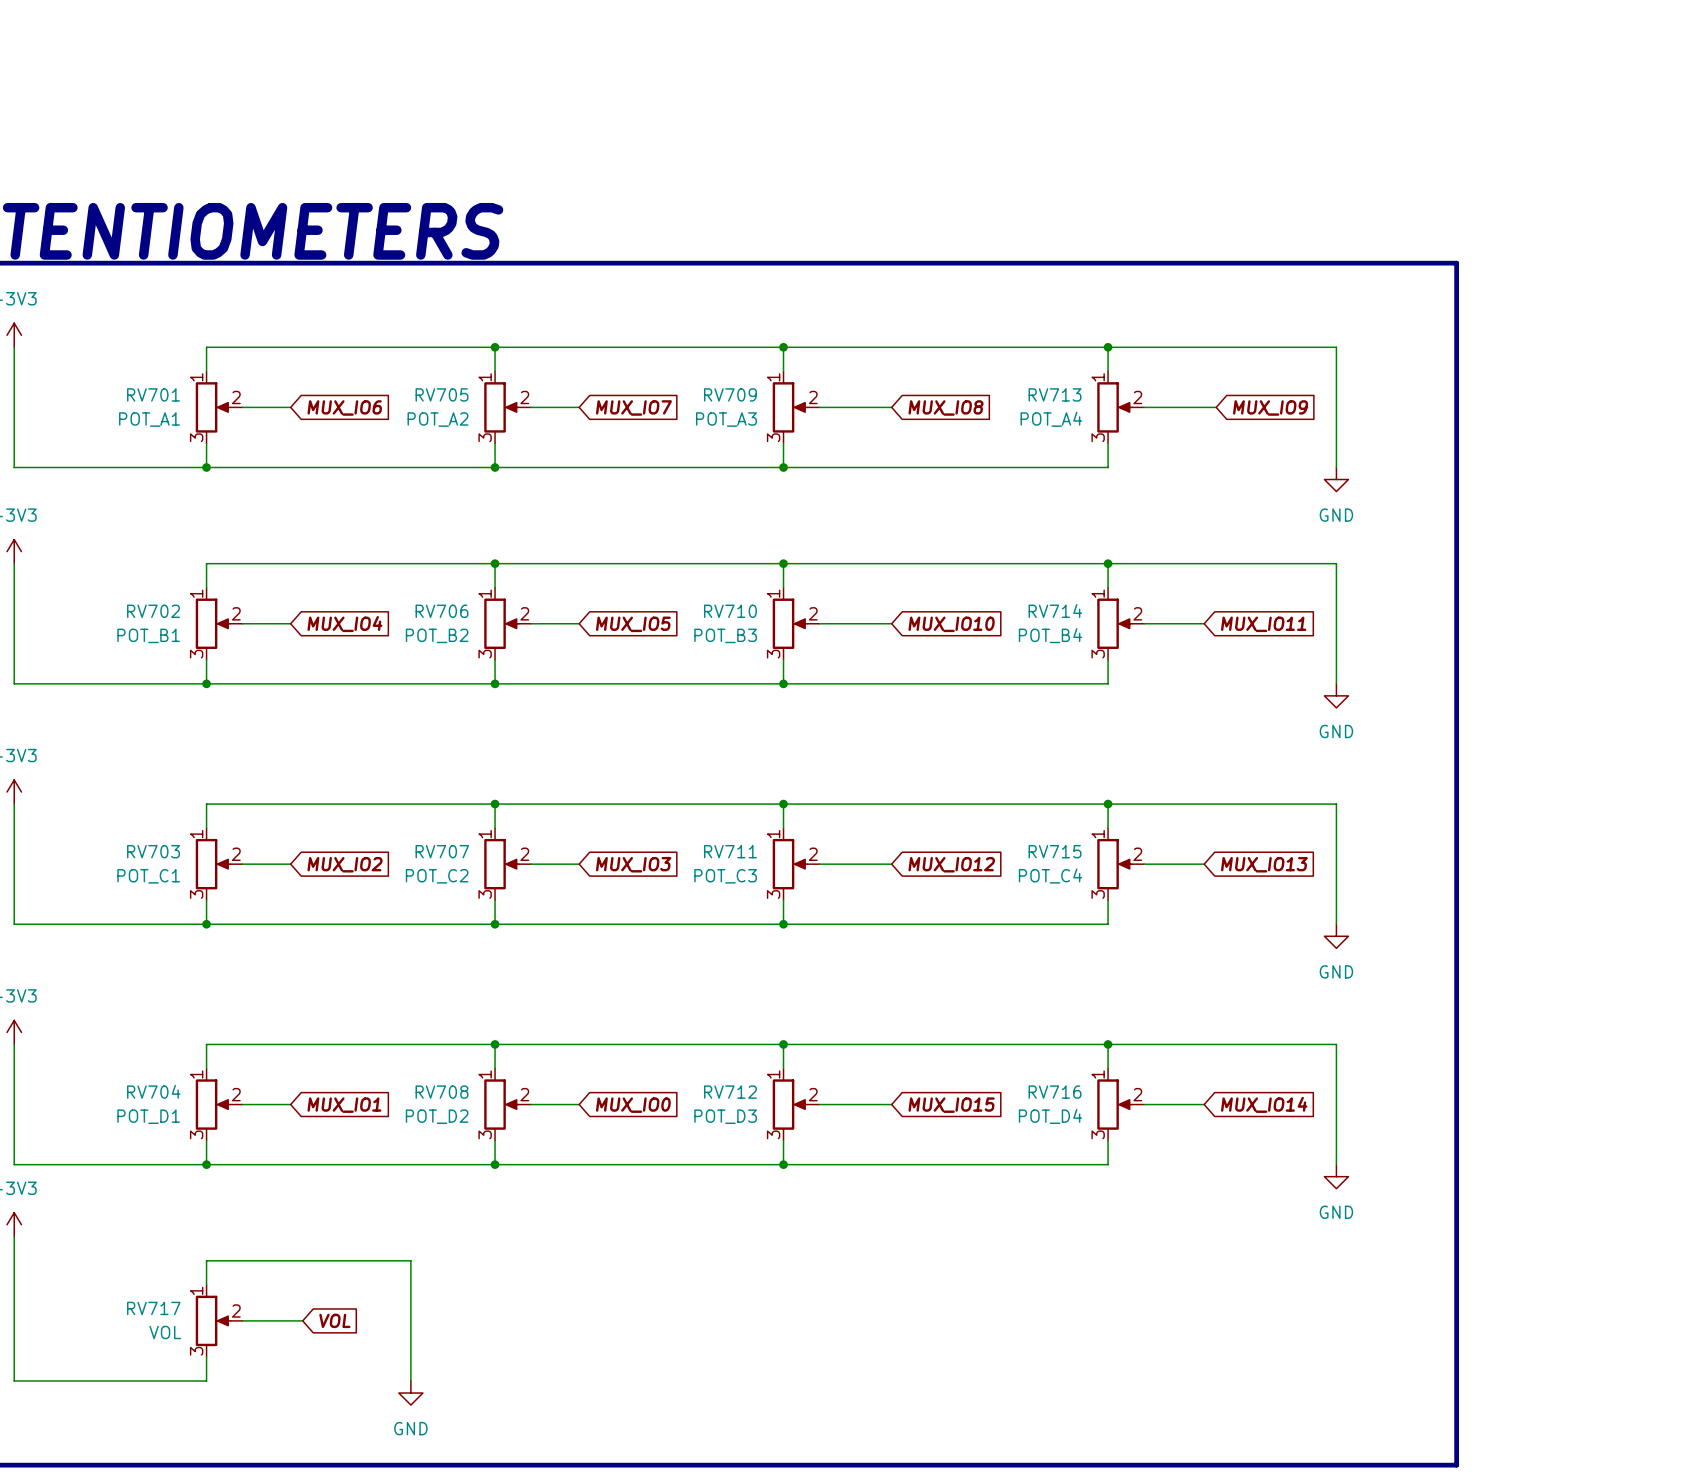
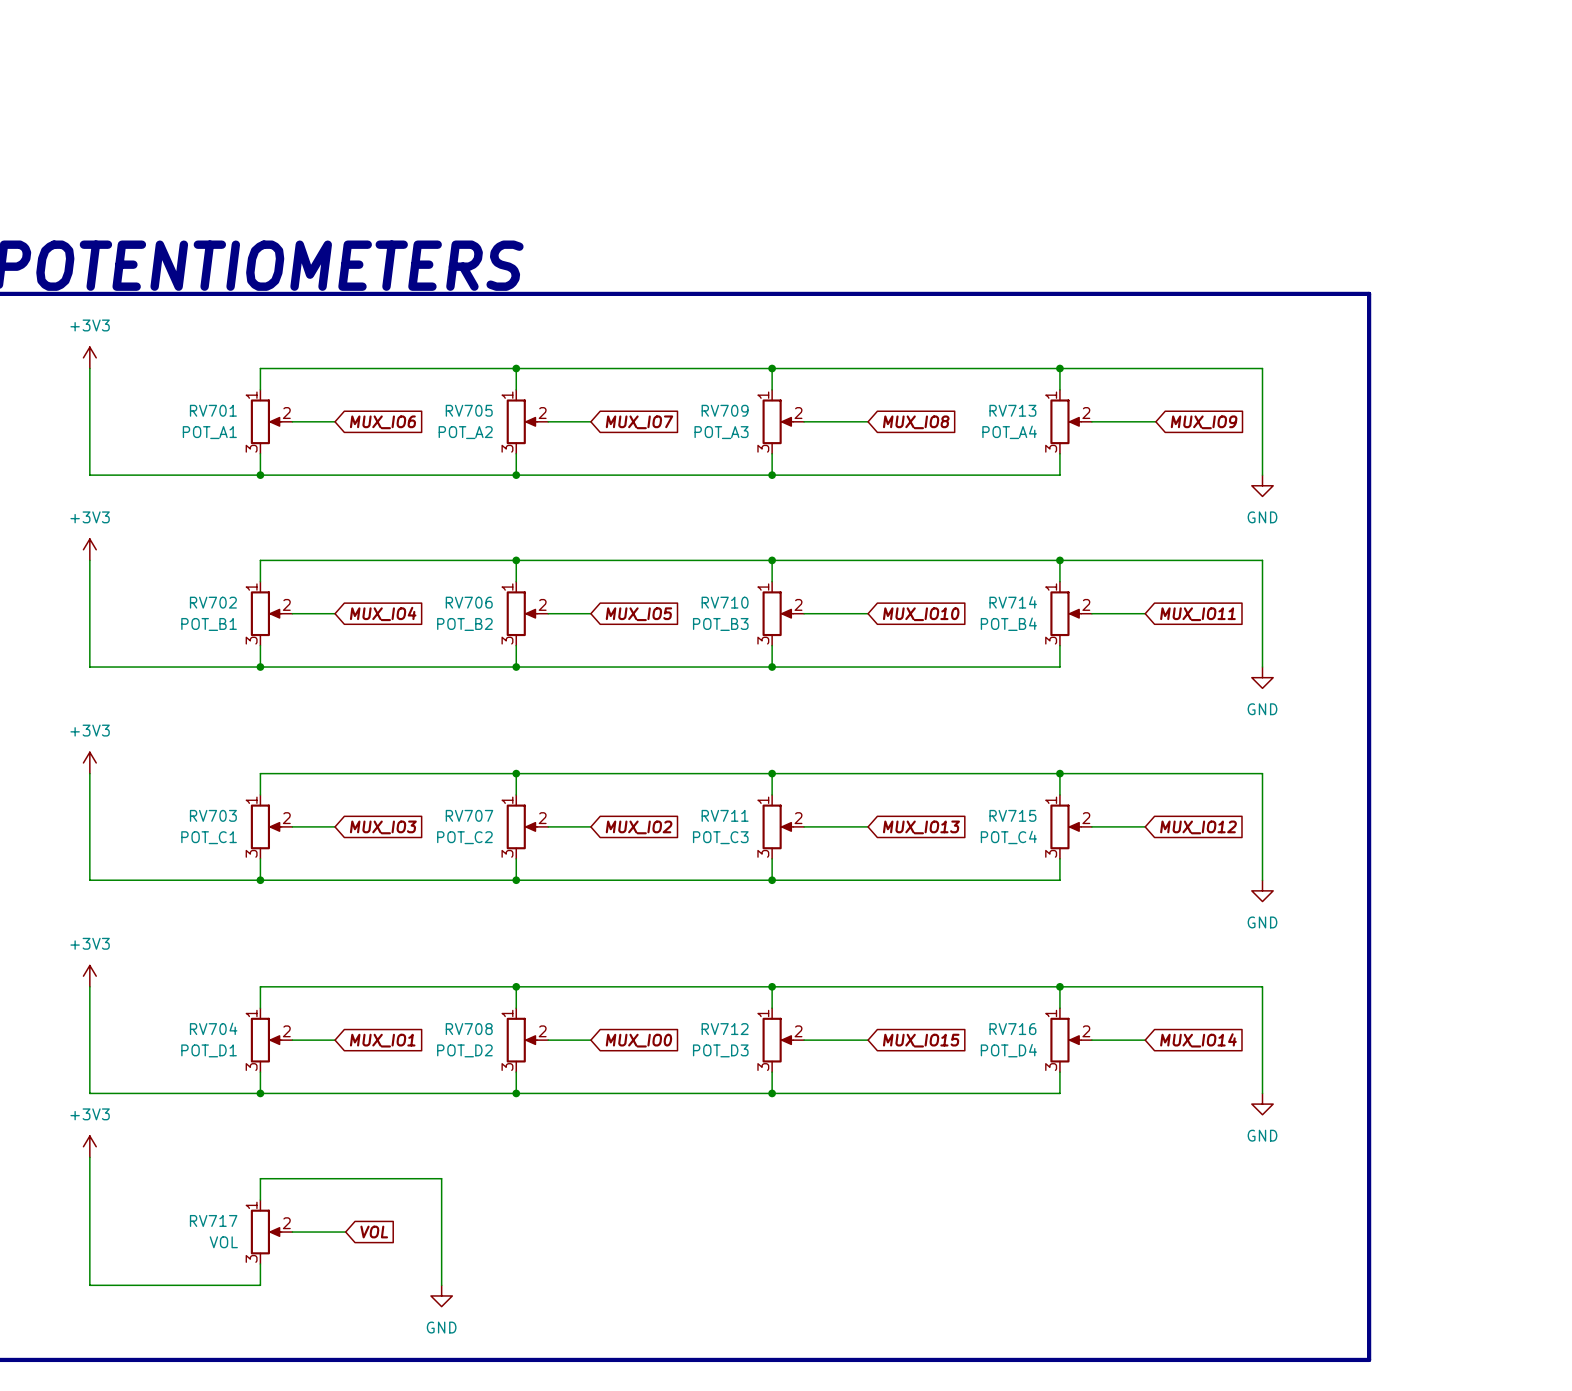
global label: MUX_IO2 (345, 864) -> MUX_IO3 (383, 827)
global label: MUX_IO3 (633, 864) -> MUX_IO2 (639, 827)
global label: MUX_IO12 (951, 864) -> MUX_IO13 (921, 827)
global label: MUX_IO13 (1264, 864) -> MUX_IO12 (1198, 827)

